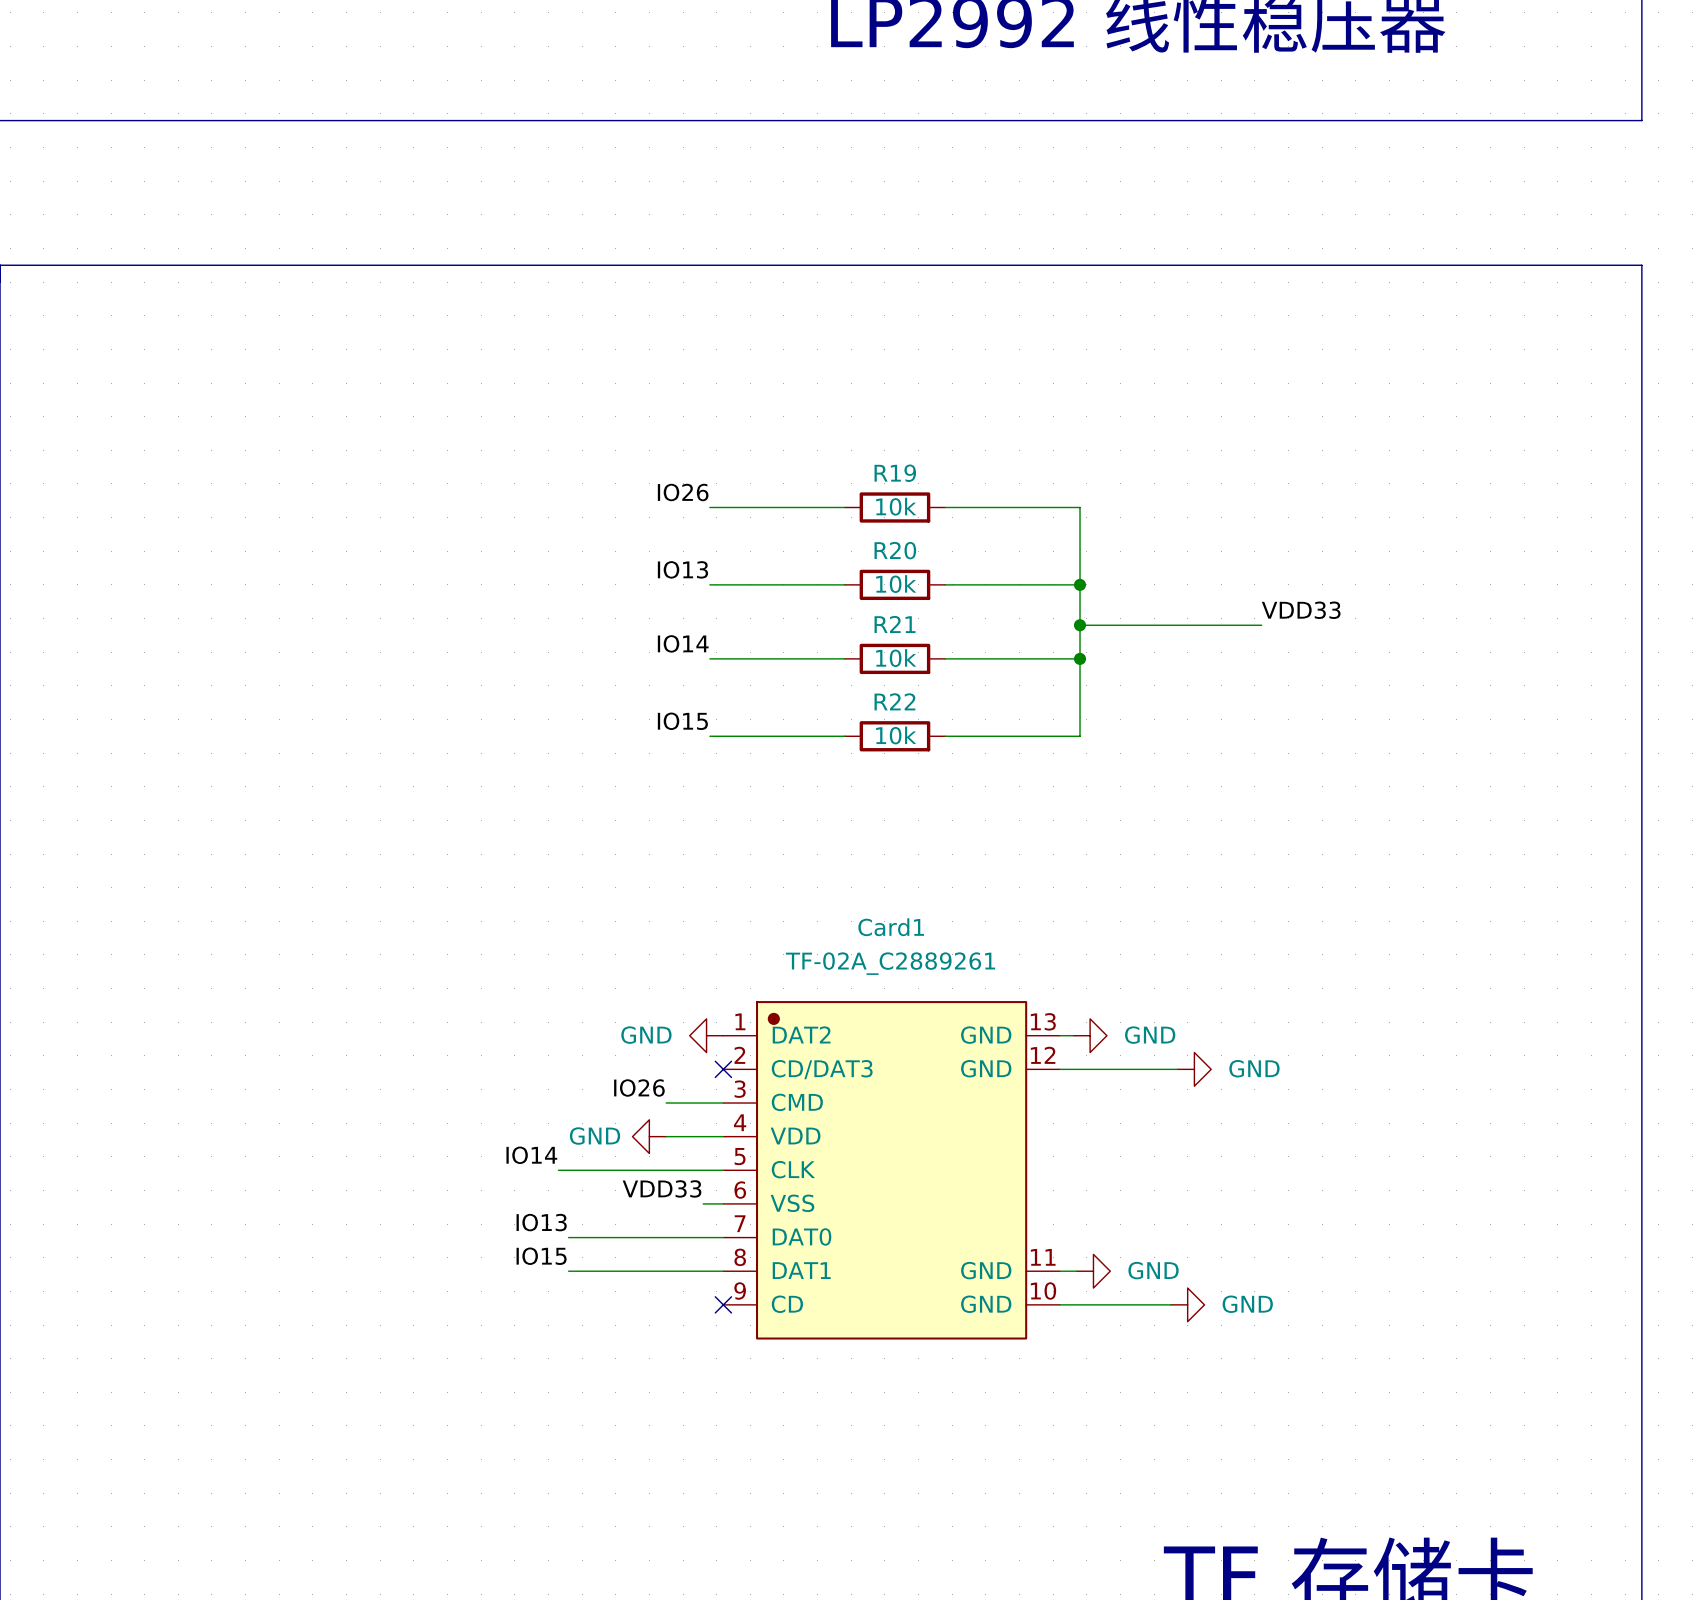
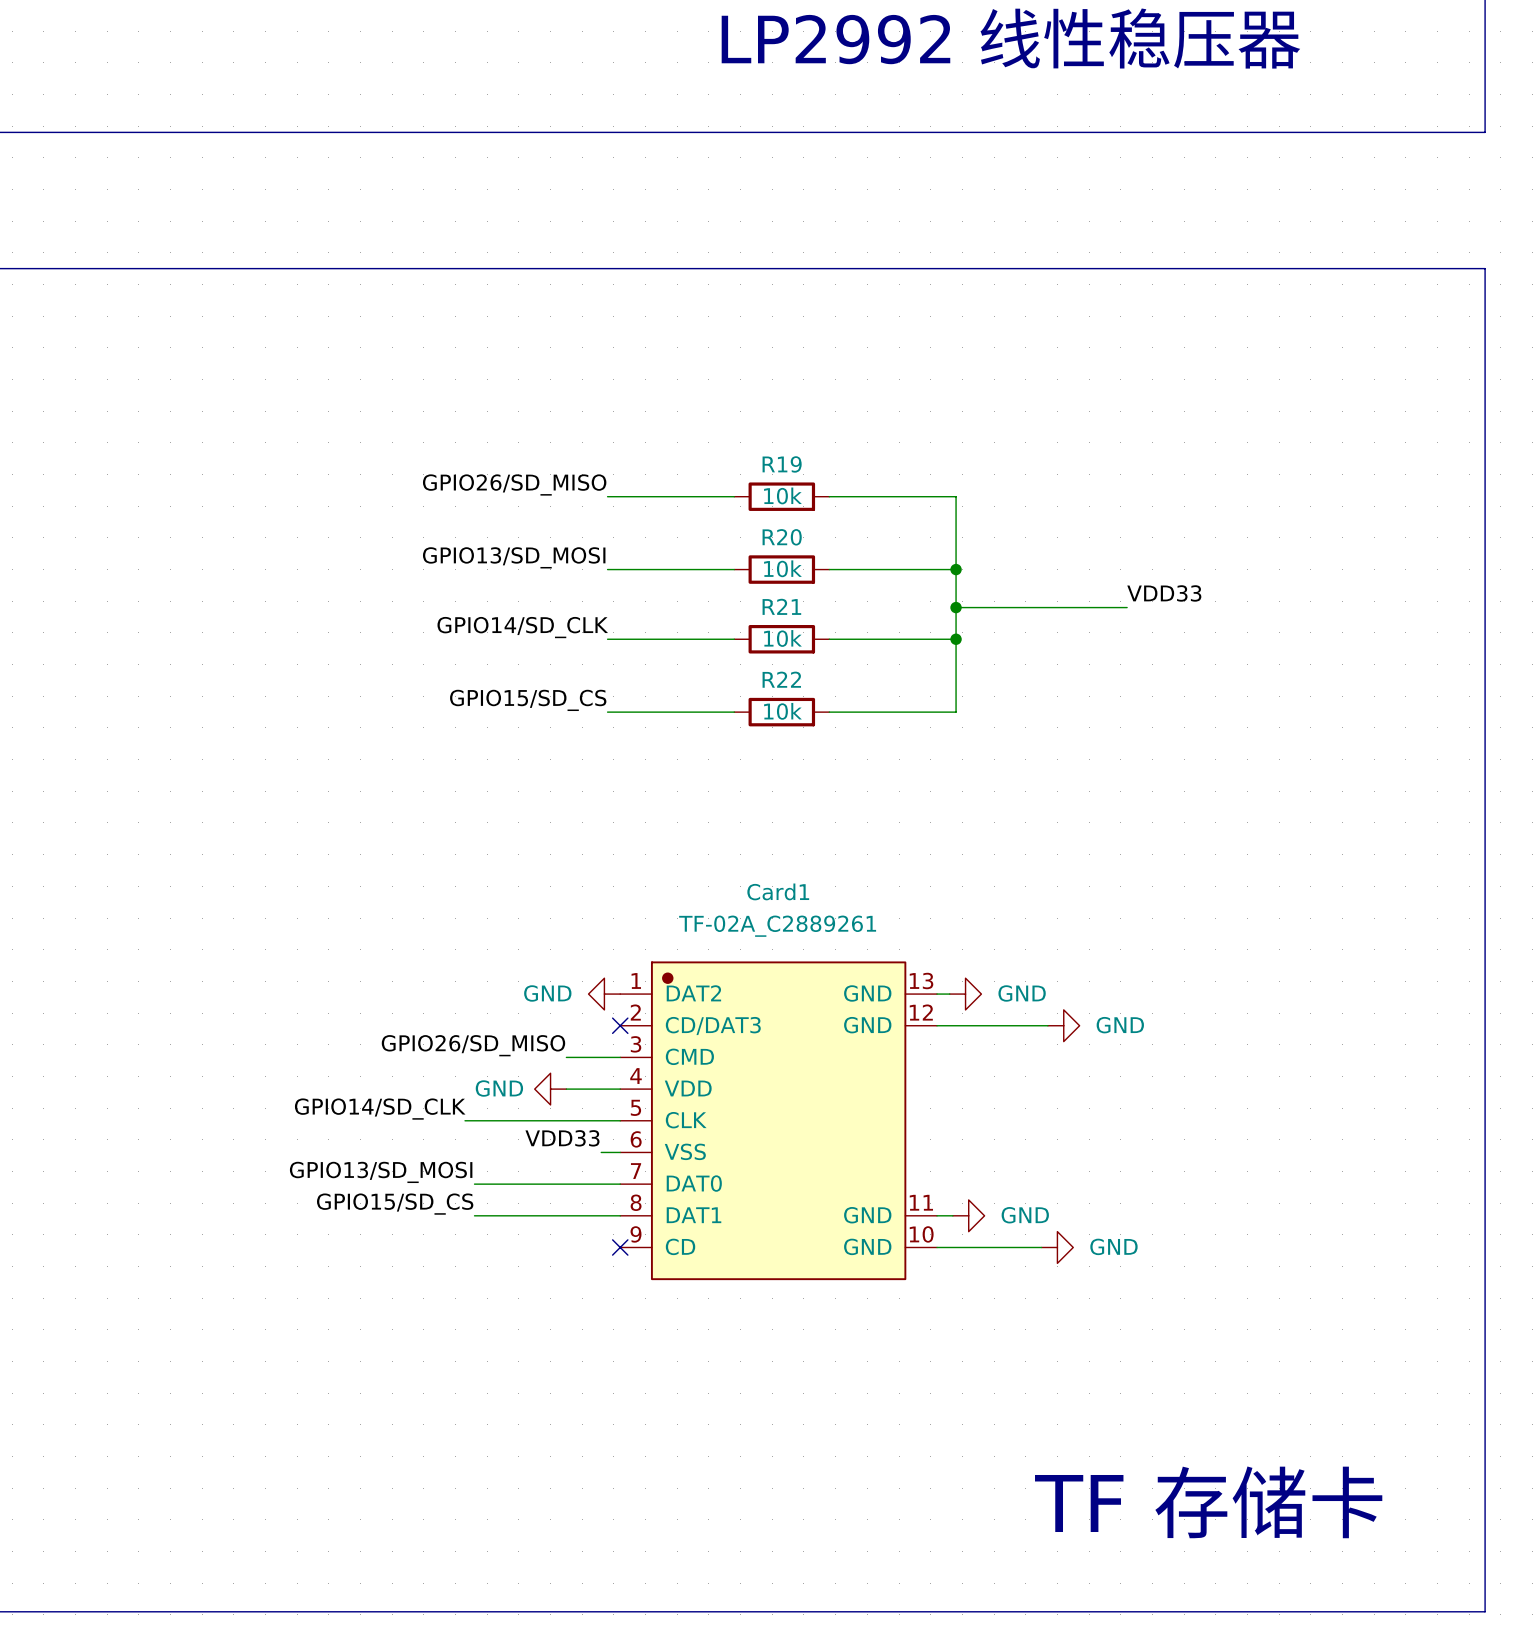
label: IO26 (683, 492) -> GPIO26/SD_MISO (514, 484)
label: IO13 (682, 569) -> GPIO13/SD_MOSI (514, 557)
label: IO14 (683, 643) -> GPIO14/SD_CLK (522, 627)
label: IO15 (682, 721) -> GPIO15/SD_CS (528, 700)
label: IO26 (639, 1088) -> GPIO26/SD_MISO (473, 1045)
label: IO14 (531, 1155) -> GPIO14/SD_CLK (380, 1109)
label: IO13 (541, 1222) -> GPIO13/SD_MOSI (381, 1172)
label: IO15 (541, 1256) -> GPIO15/SD_CS (395, 1204)

